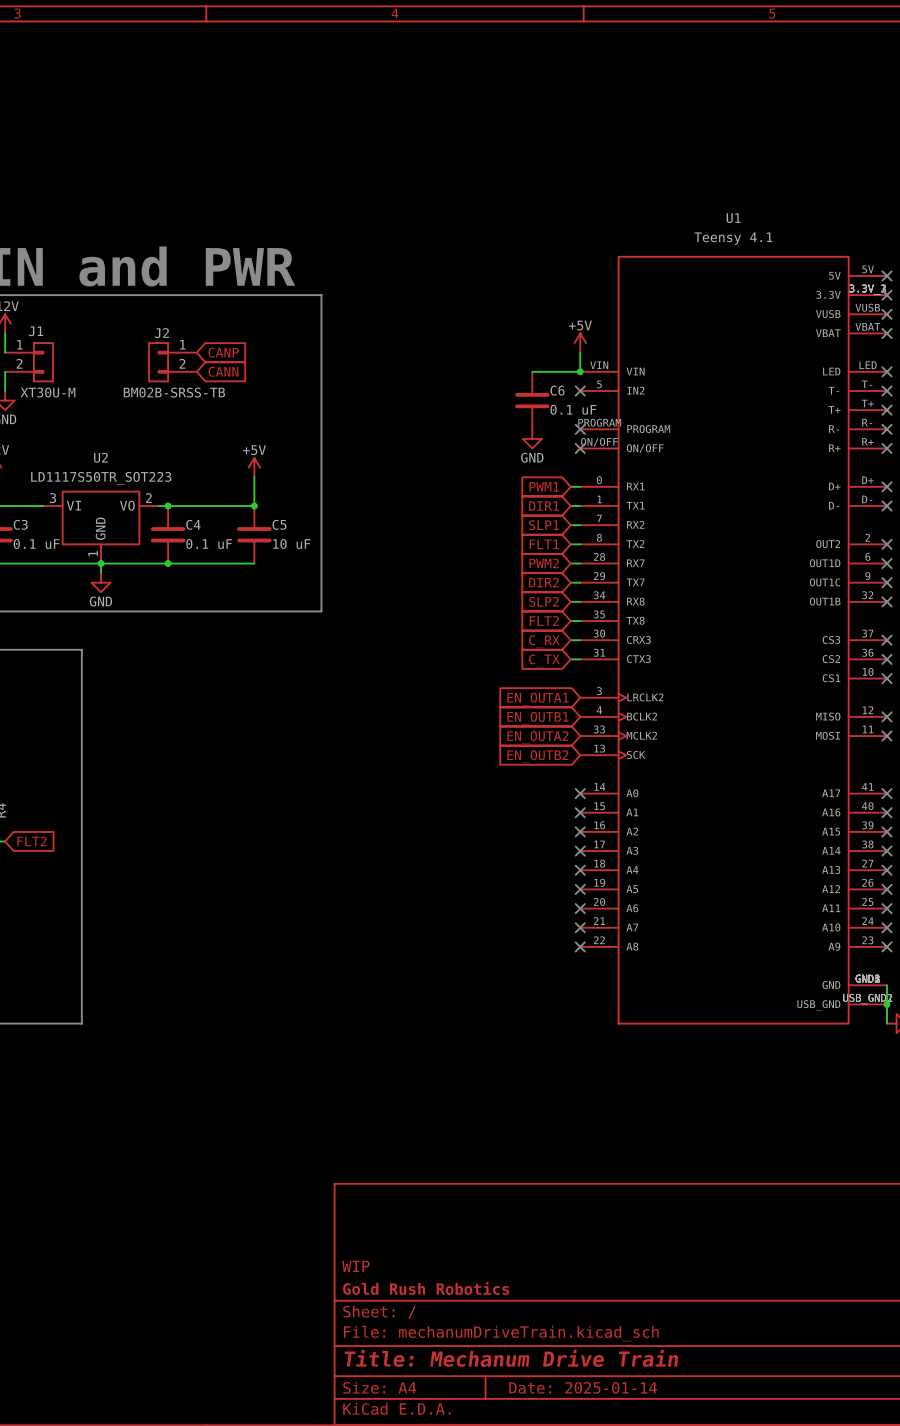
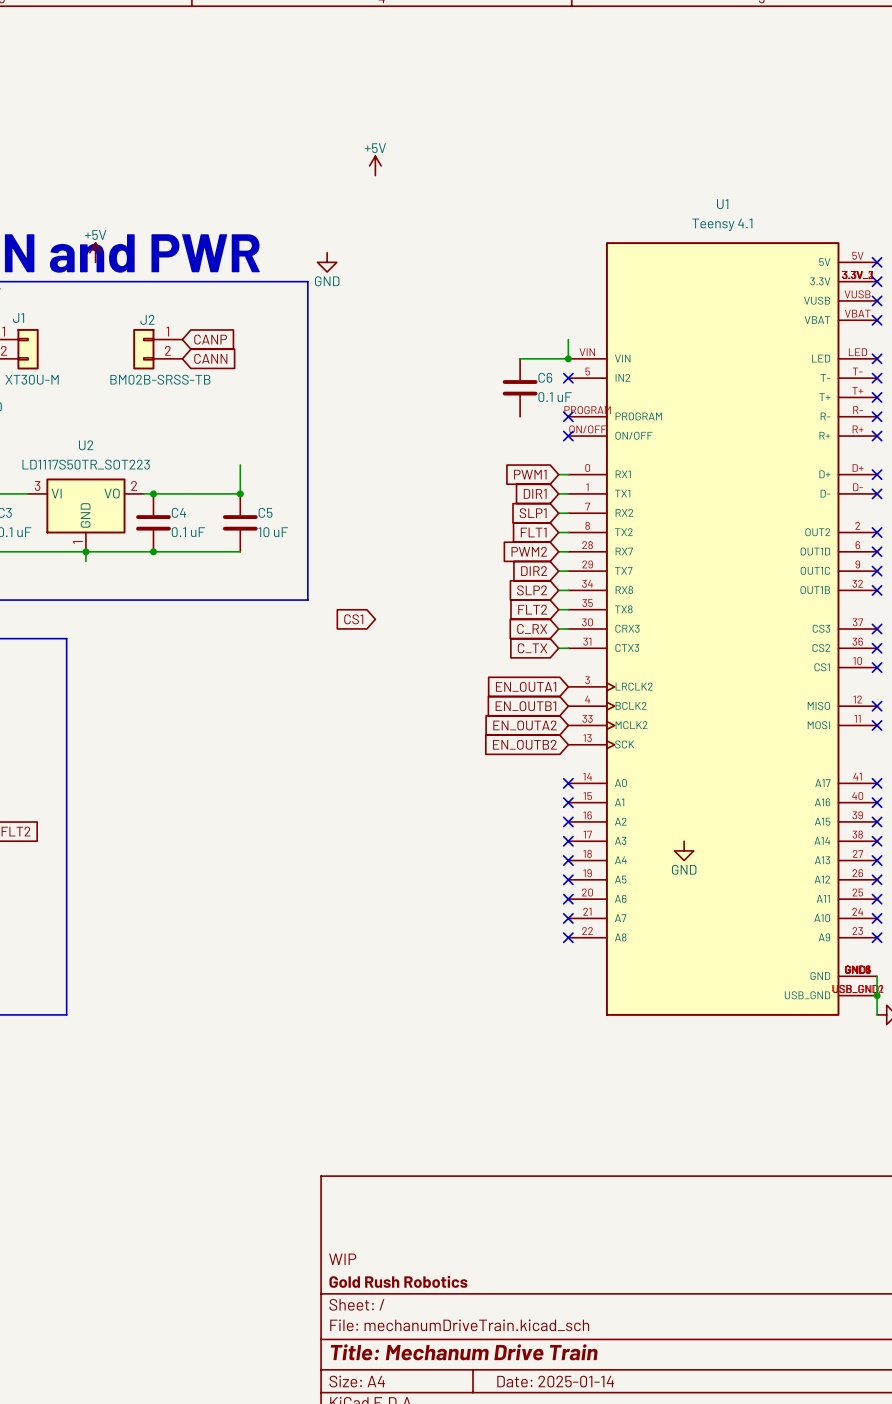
power symbol: none -> +5V (375, 165)
power symbol: none -> +5V (95, 252)
power symbol: none -> GND (327, 262)
power symbol: +5V (580, 343) -> none
power symbol: GND (532, 438) -> none
power symbol: +5V (254, 467) -> none
power symbol: GND (101, 582) -> none
global label: none -> CS1 (353, 619)
power symbol: none -> GND (684, 850)

